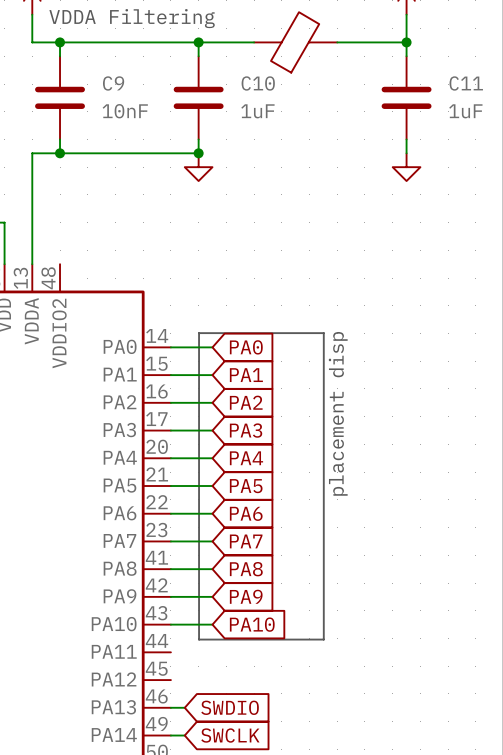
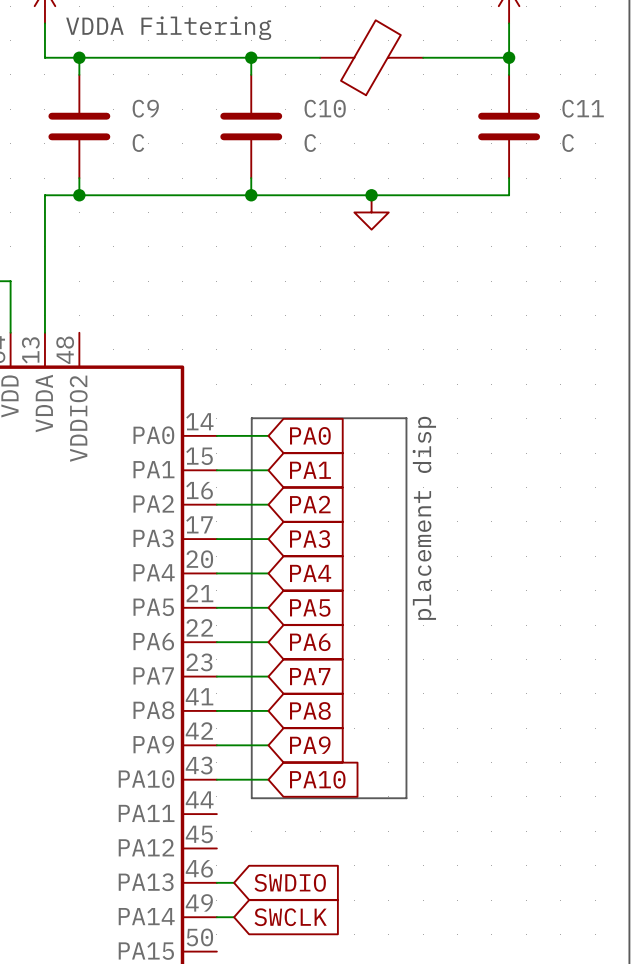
C9 value: 10nF (125, 111) -> C (138, 143)
C10 value: 1uF (257, 111) -> C (310, 143)
C11 value: 1uF (465, 111) -> C (568, 143)
wire: none -> (251, 195) (509, 195)
junction: none -> (371, 195)
power symbol: (198, 167) -> none
power symbol: none -> (371, 212)
power symbol: (406, 167) -> none

